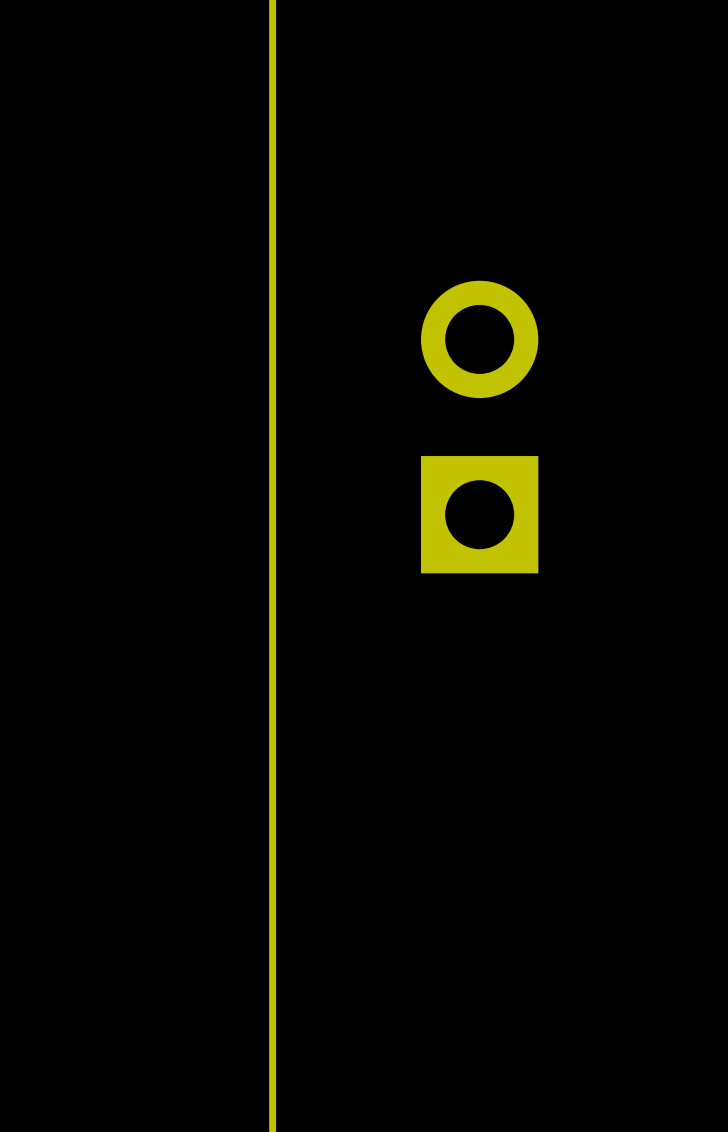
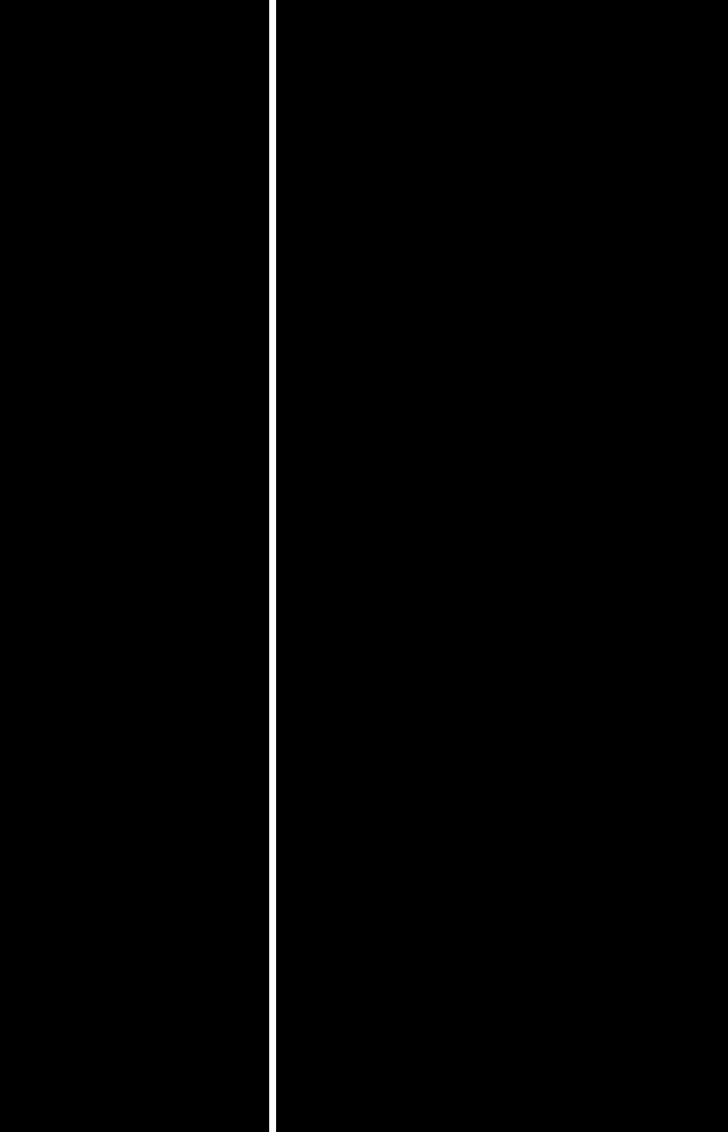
part: (479, 427) -> none

